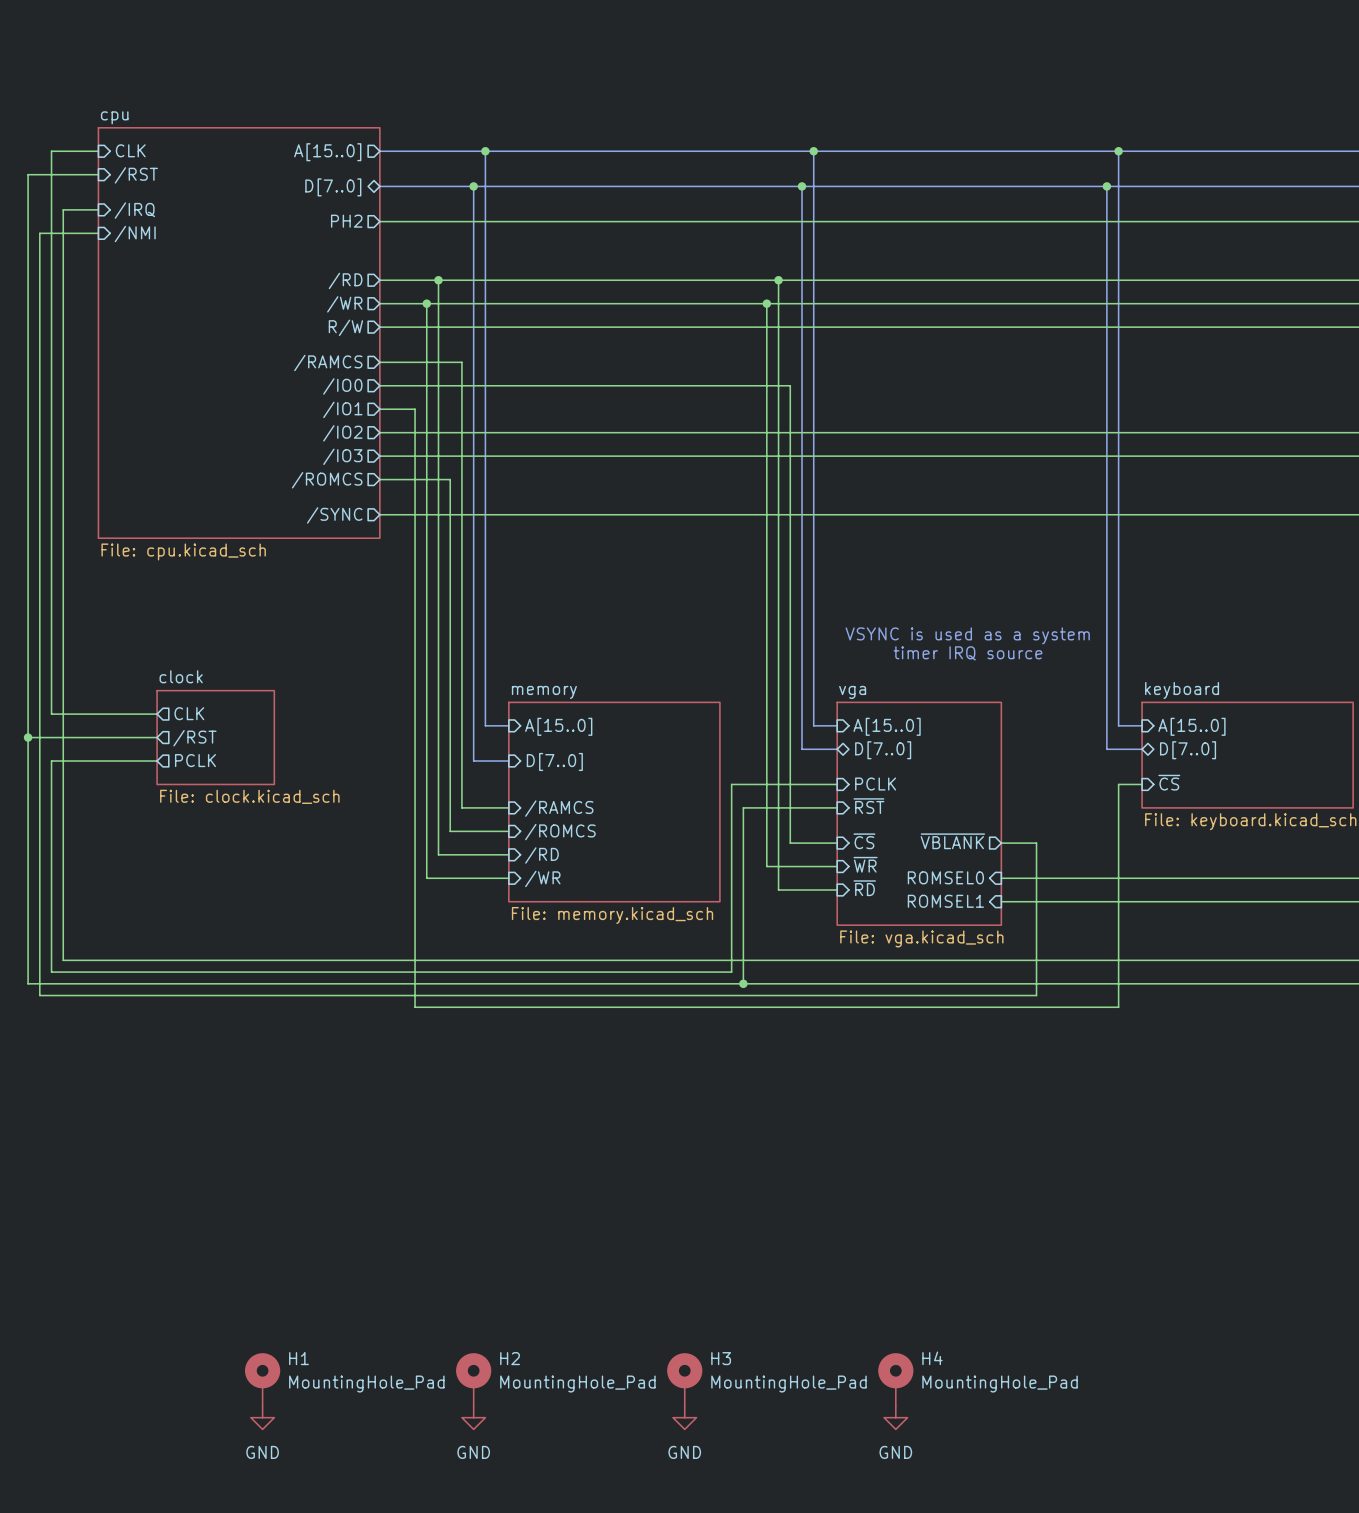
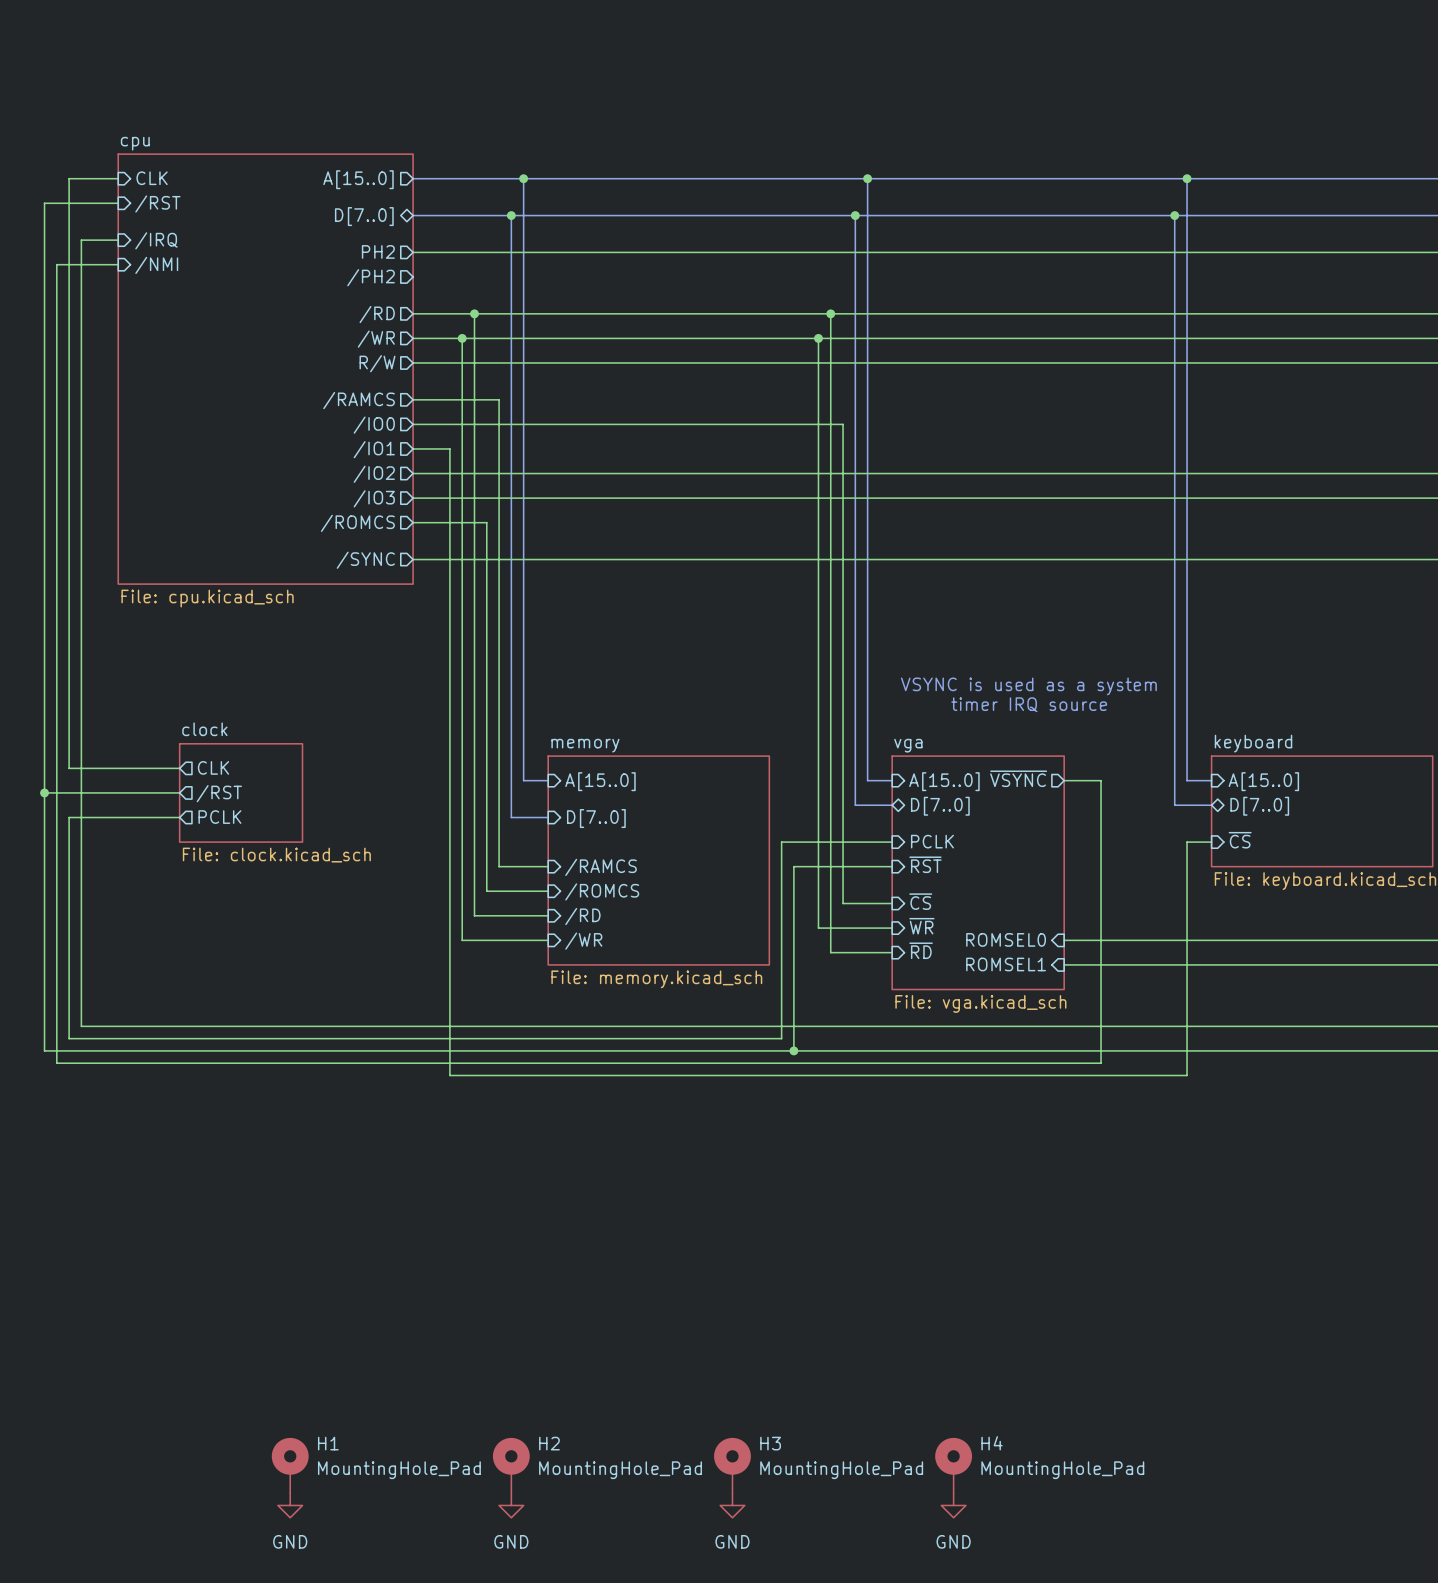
sheet pin: none -> /PH2 (371, 277)
sheet pin: none -> ~{VSYNC} (1018, 778)
sheet pin: ~{VBLANK} (952, 841) -> none
wire: (1001, 843) (1036, 843) -> (1064, 780) (1101, 780) (1101, 903)

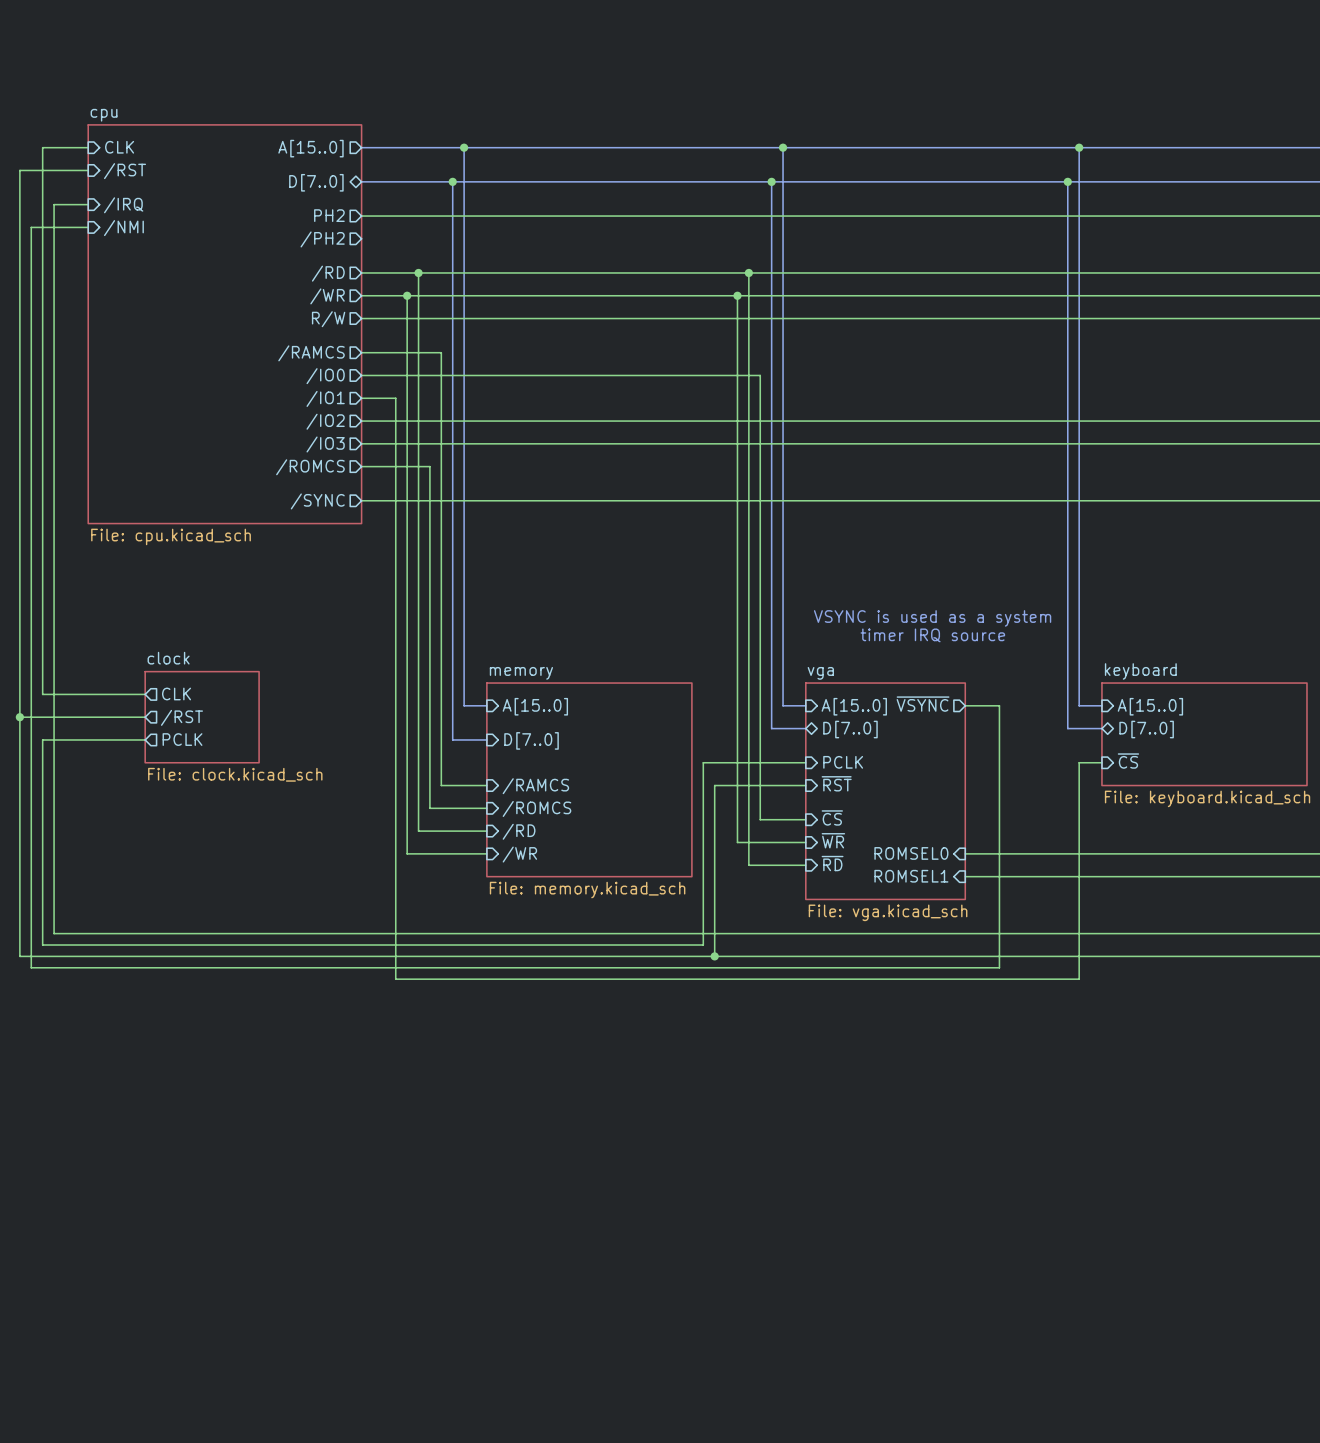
H1: MountingHole_Pad (290, 1465) -> none
H2: MountingHole_Pad (511, 1465) -> none
H3: MountingHole_Pad (732, 1465) -> none
H4: MountingHole_Pad (953, 1465) -> none
power symbol: GND (290, 1505) -> none
power symbol: GND (511, 1505) -> none
power symbol: GND (732, 1505) -> none
power symbol: GND (953, 1505) -> none

